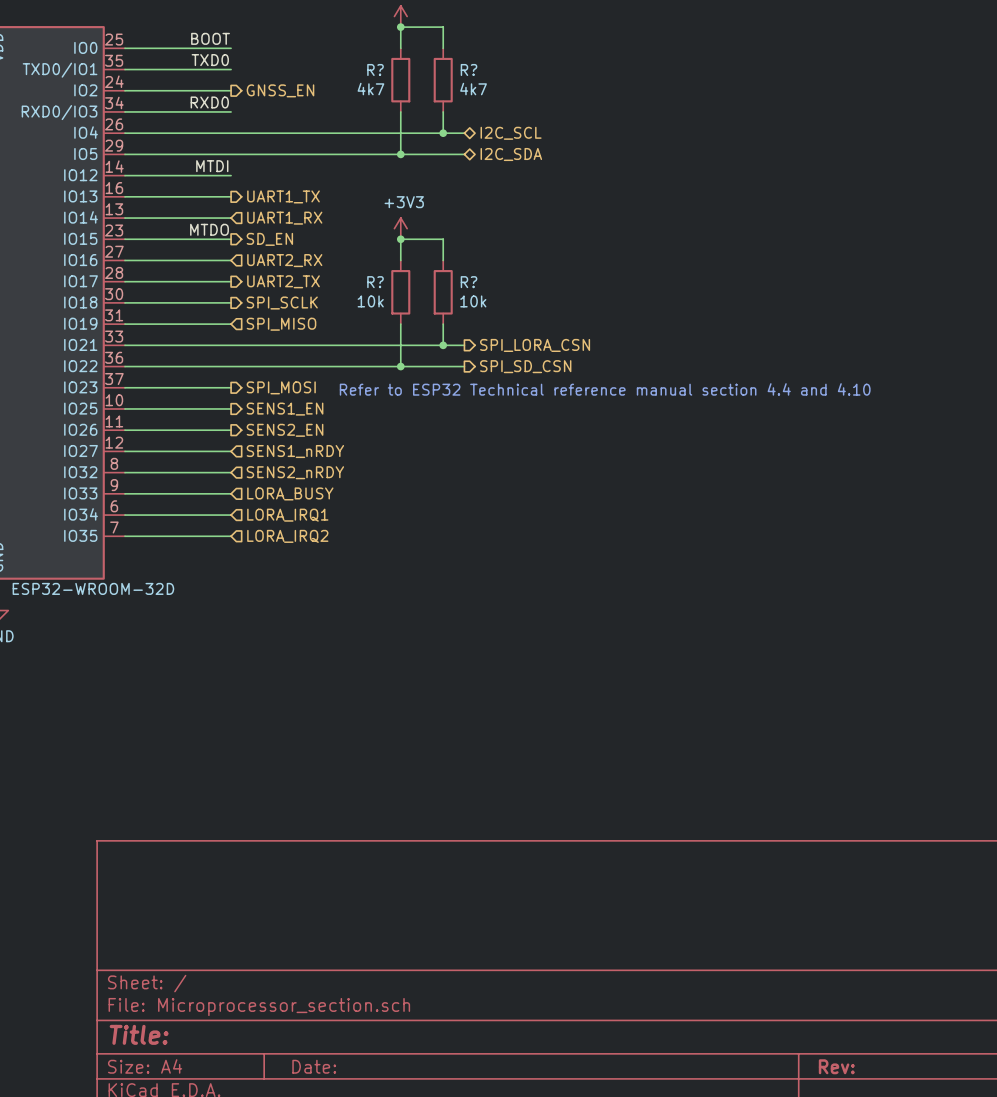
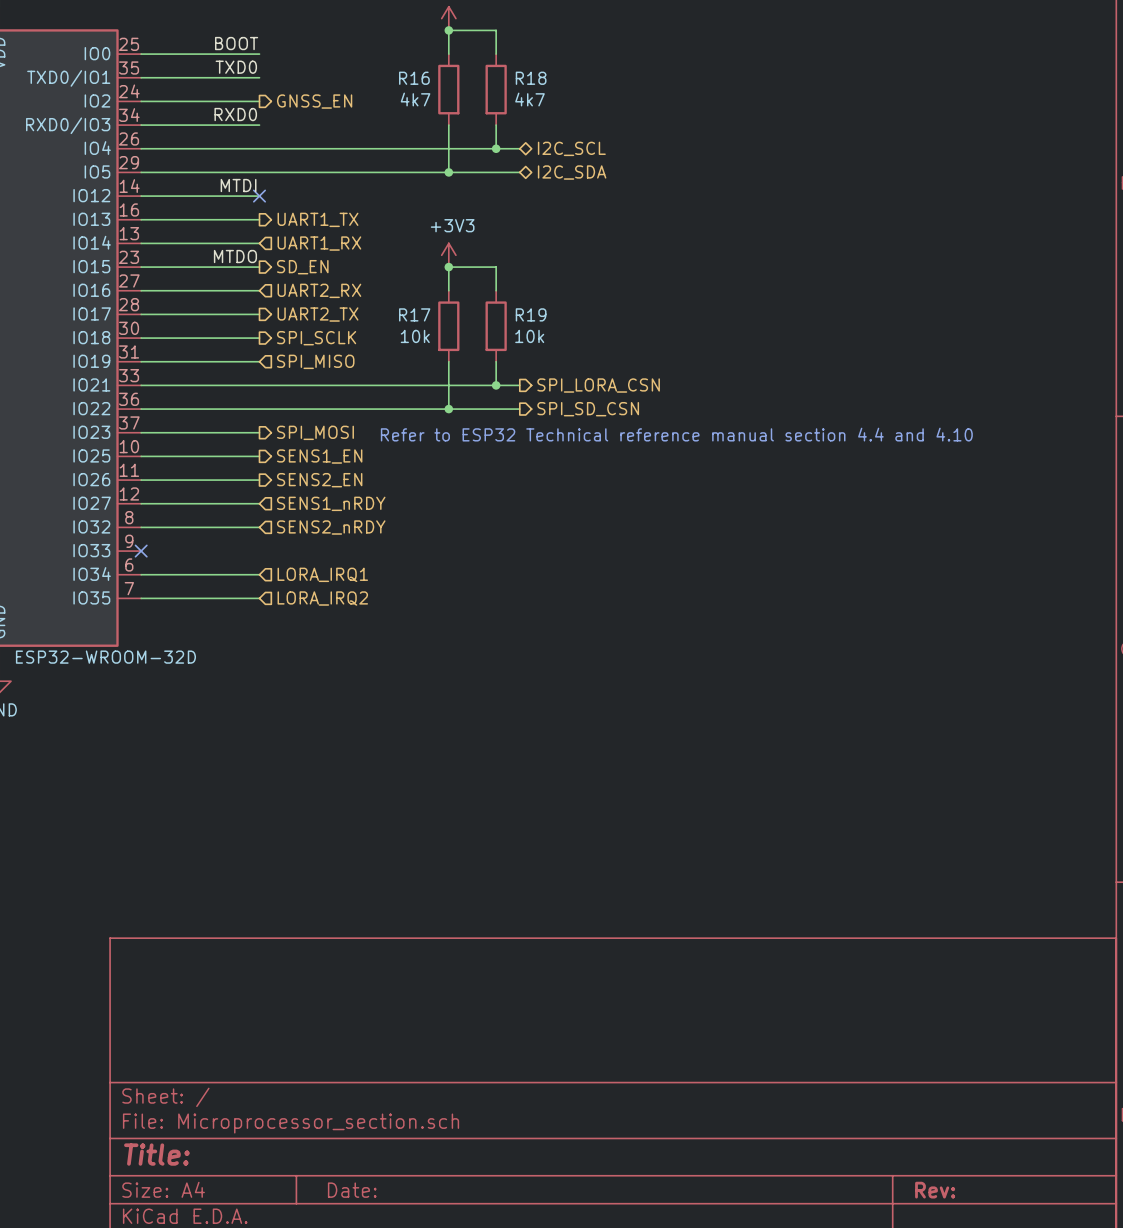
R? name: R? (375, 69) -> R16 (414, 78)
R? name: R? (469, 69) -> R18 (531, 78)
no-connect mark: none -> (259, 196)
R? name: R? (375, 282) -> R17 (414, 314)
R? name: R? (469, 282) -> R19 (531, 314)
wire: (124, 493) (231, 493) -> none
no-connect mark: none -> (141, 551)
hierarchical label: LORA_BUSY (290, 493) -> none

